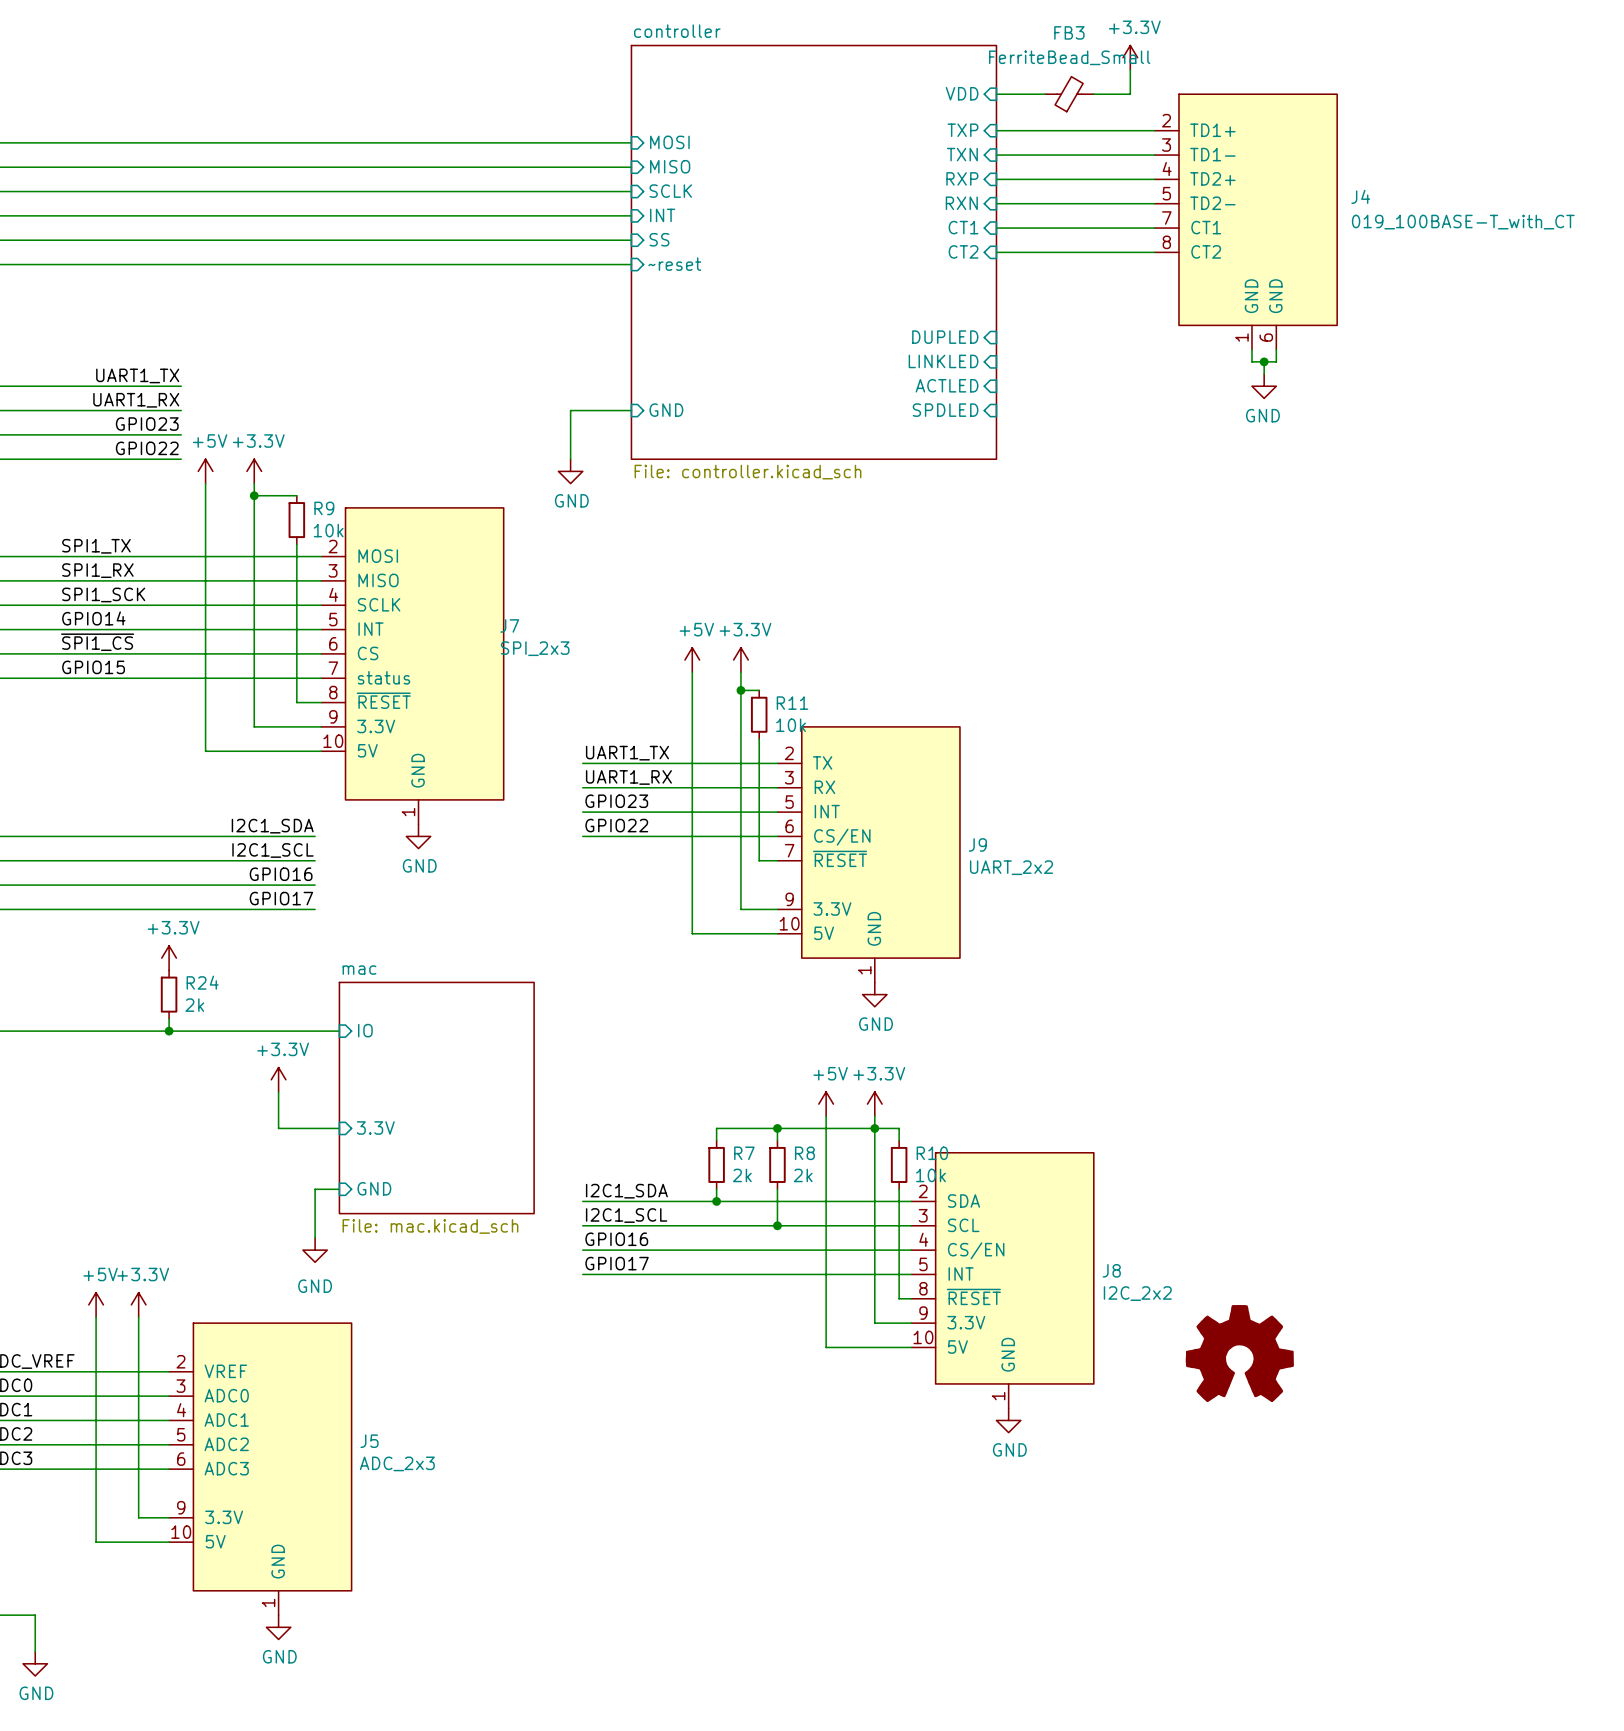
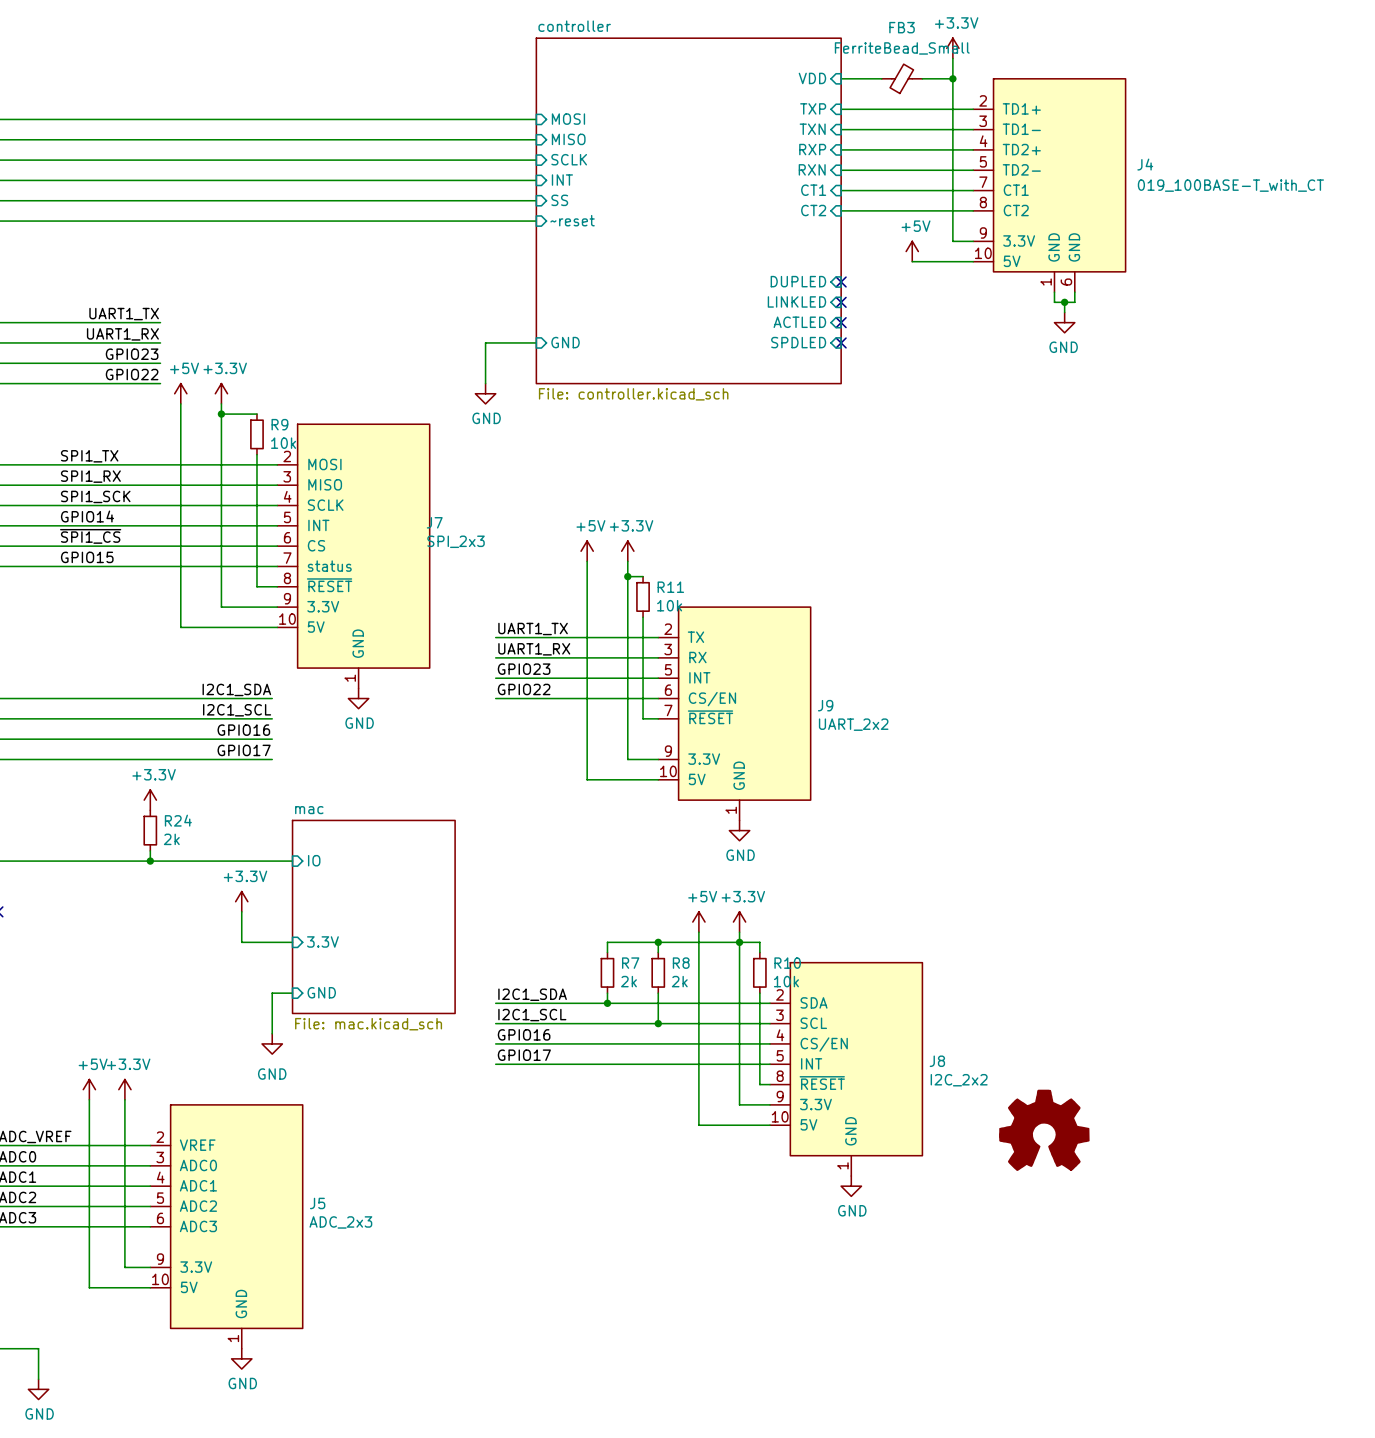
wire: none -> (952, 78) (952, 241) (973, 241)
junction: none -> (952, 78)
J4 symbol: [1154, 94, 1338, 350] -> [973, 78, 1126, 293]
power symbol: none -> +5V (912, 251)
wire: none -> (912, 261) (973, 261)
no-connect mark: none -> (841, 282)
no-connect mark: none -> (841, 302)
no-connect mark: none -> (841, 322)
no-connect mark: none -> (841, 342)

